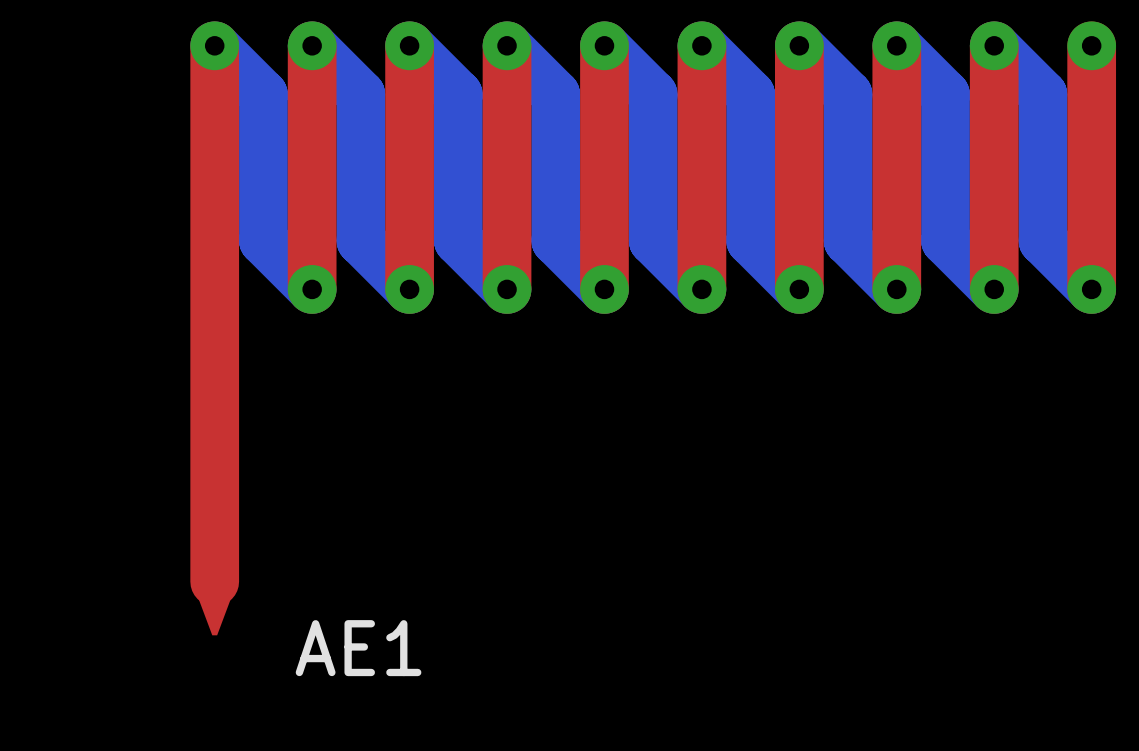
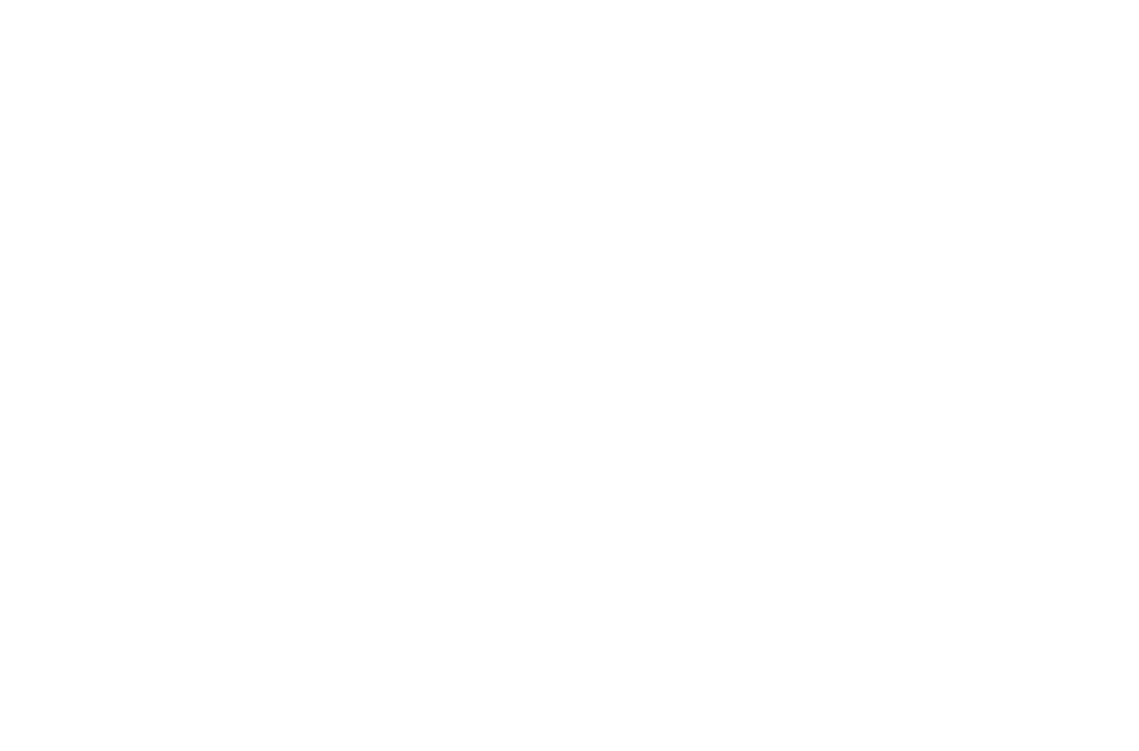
AE1: (653, 328) -> none

